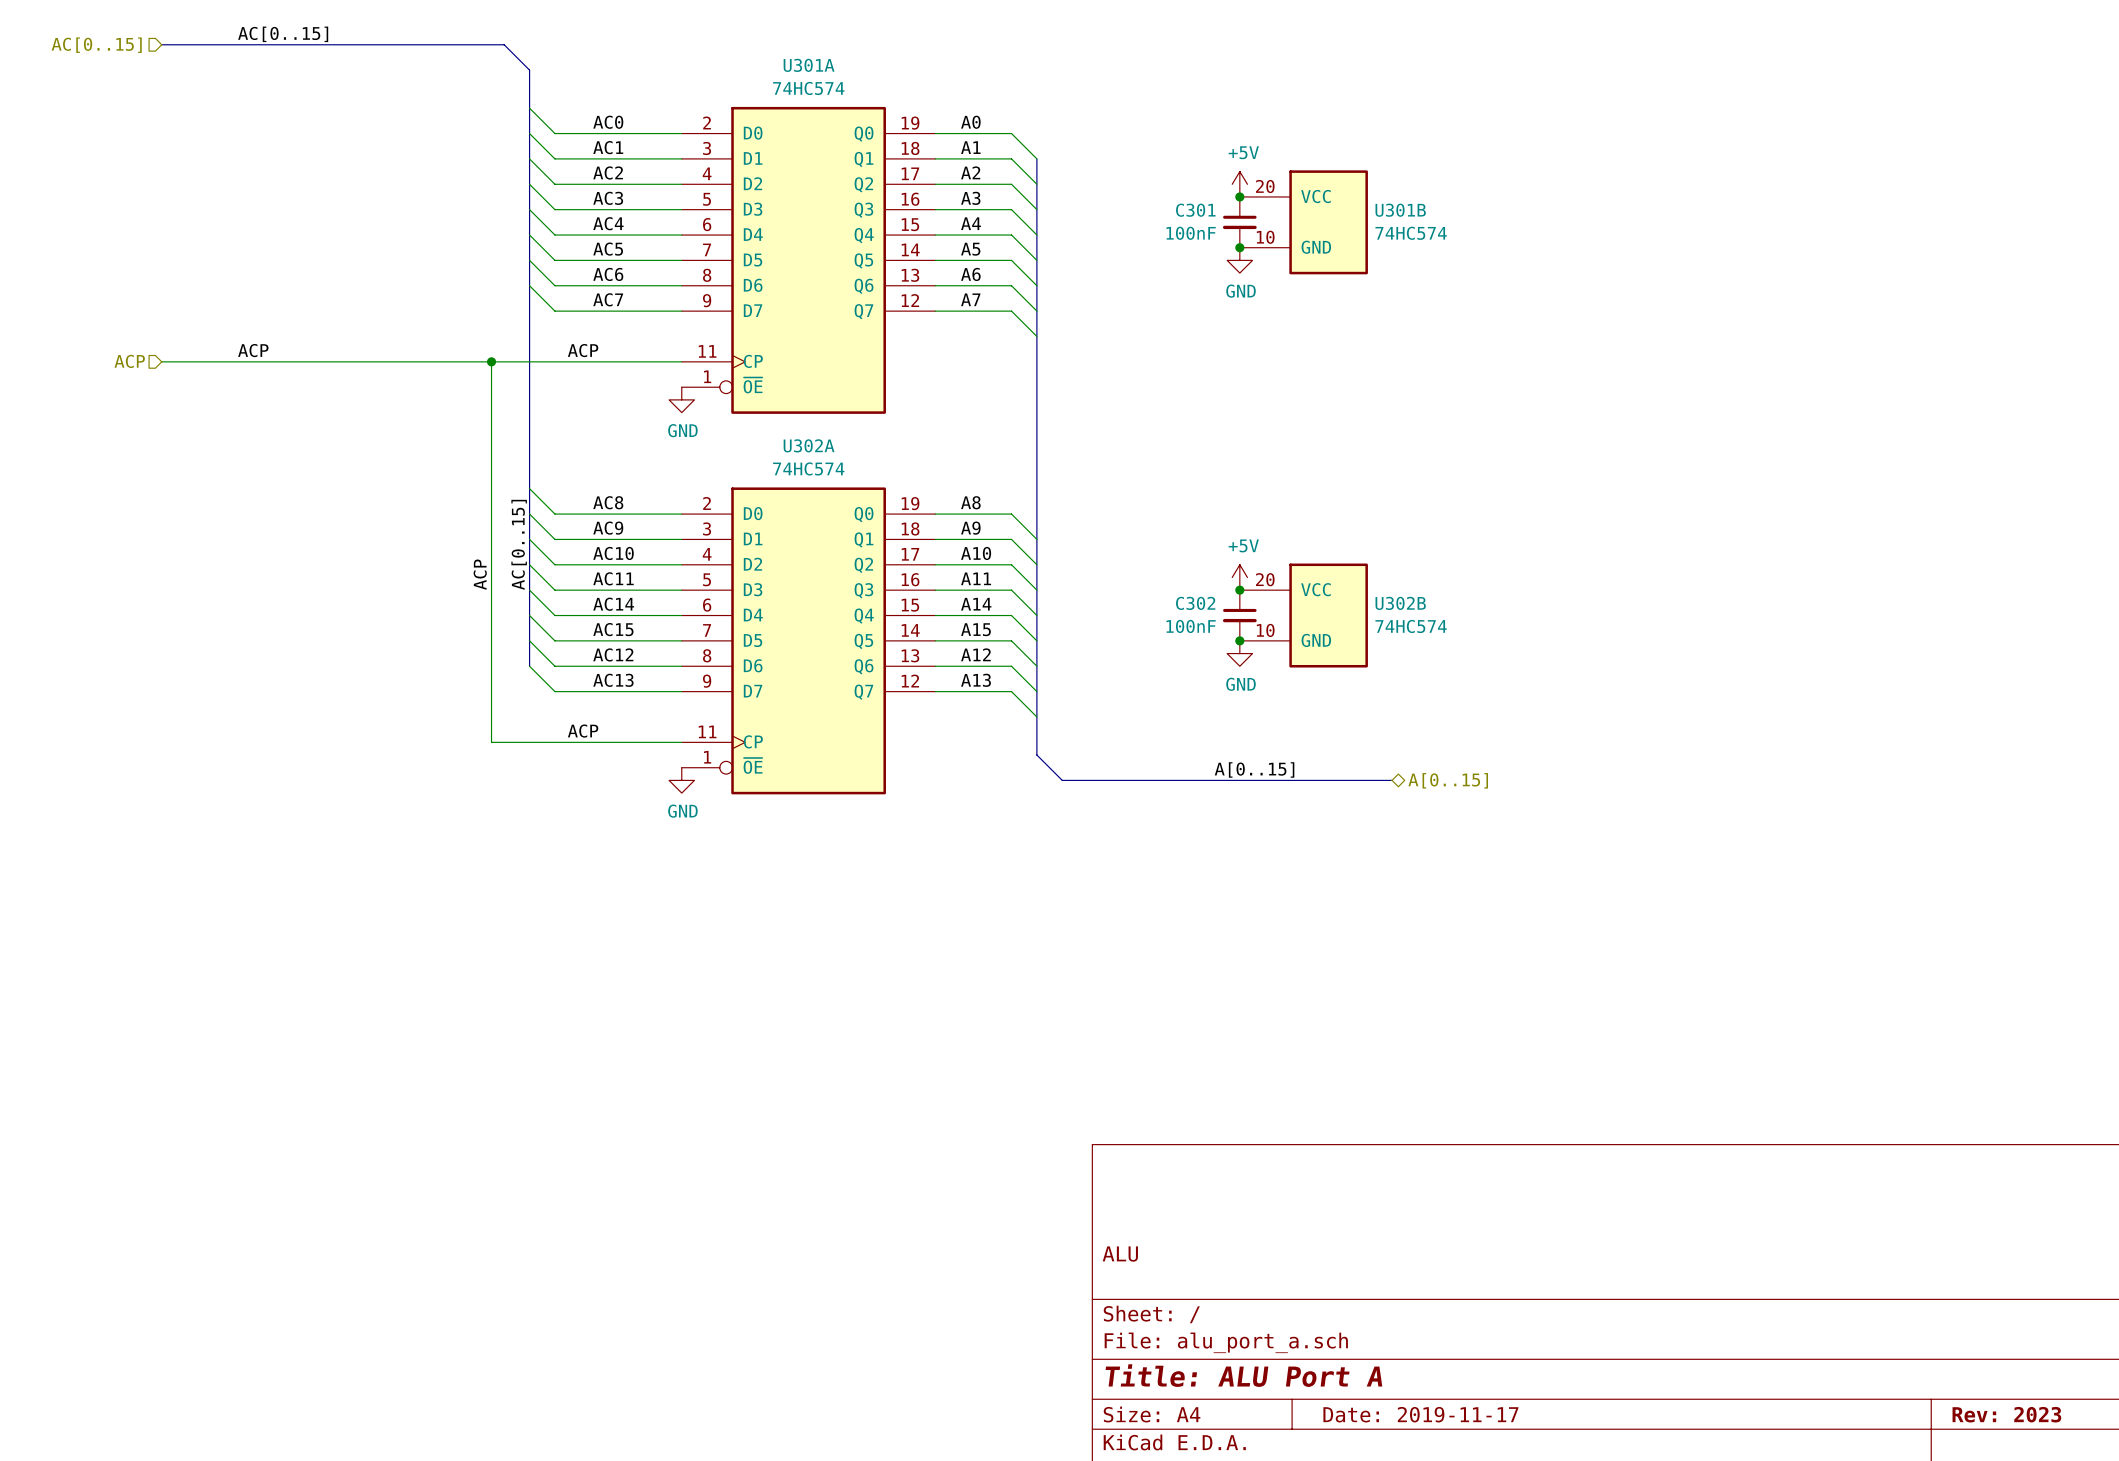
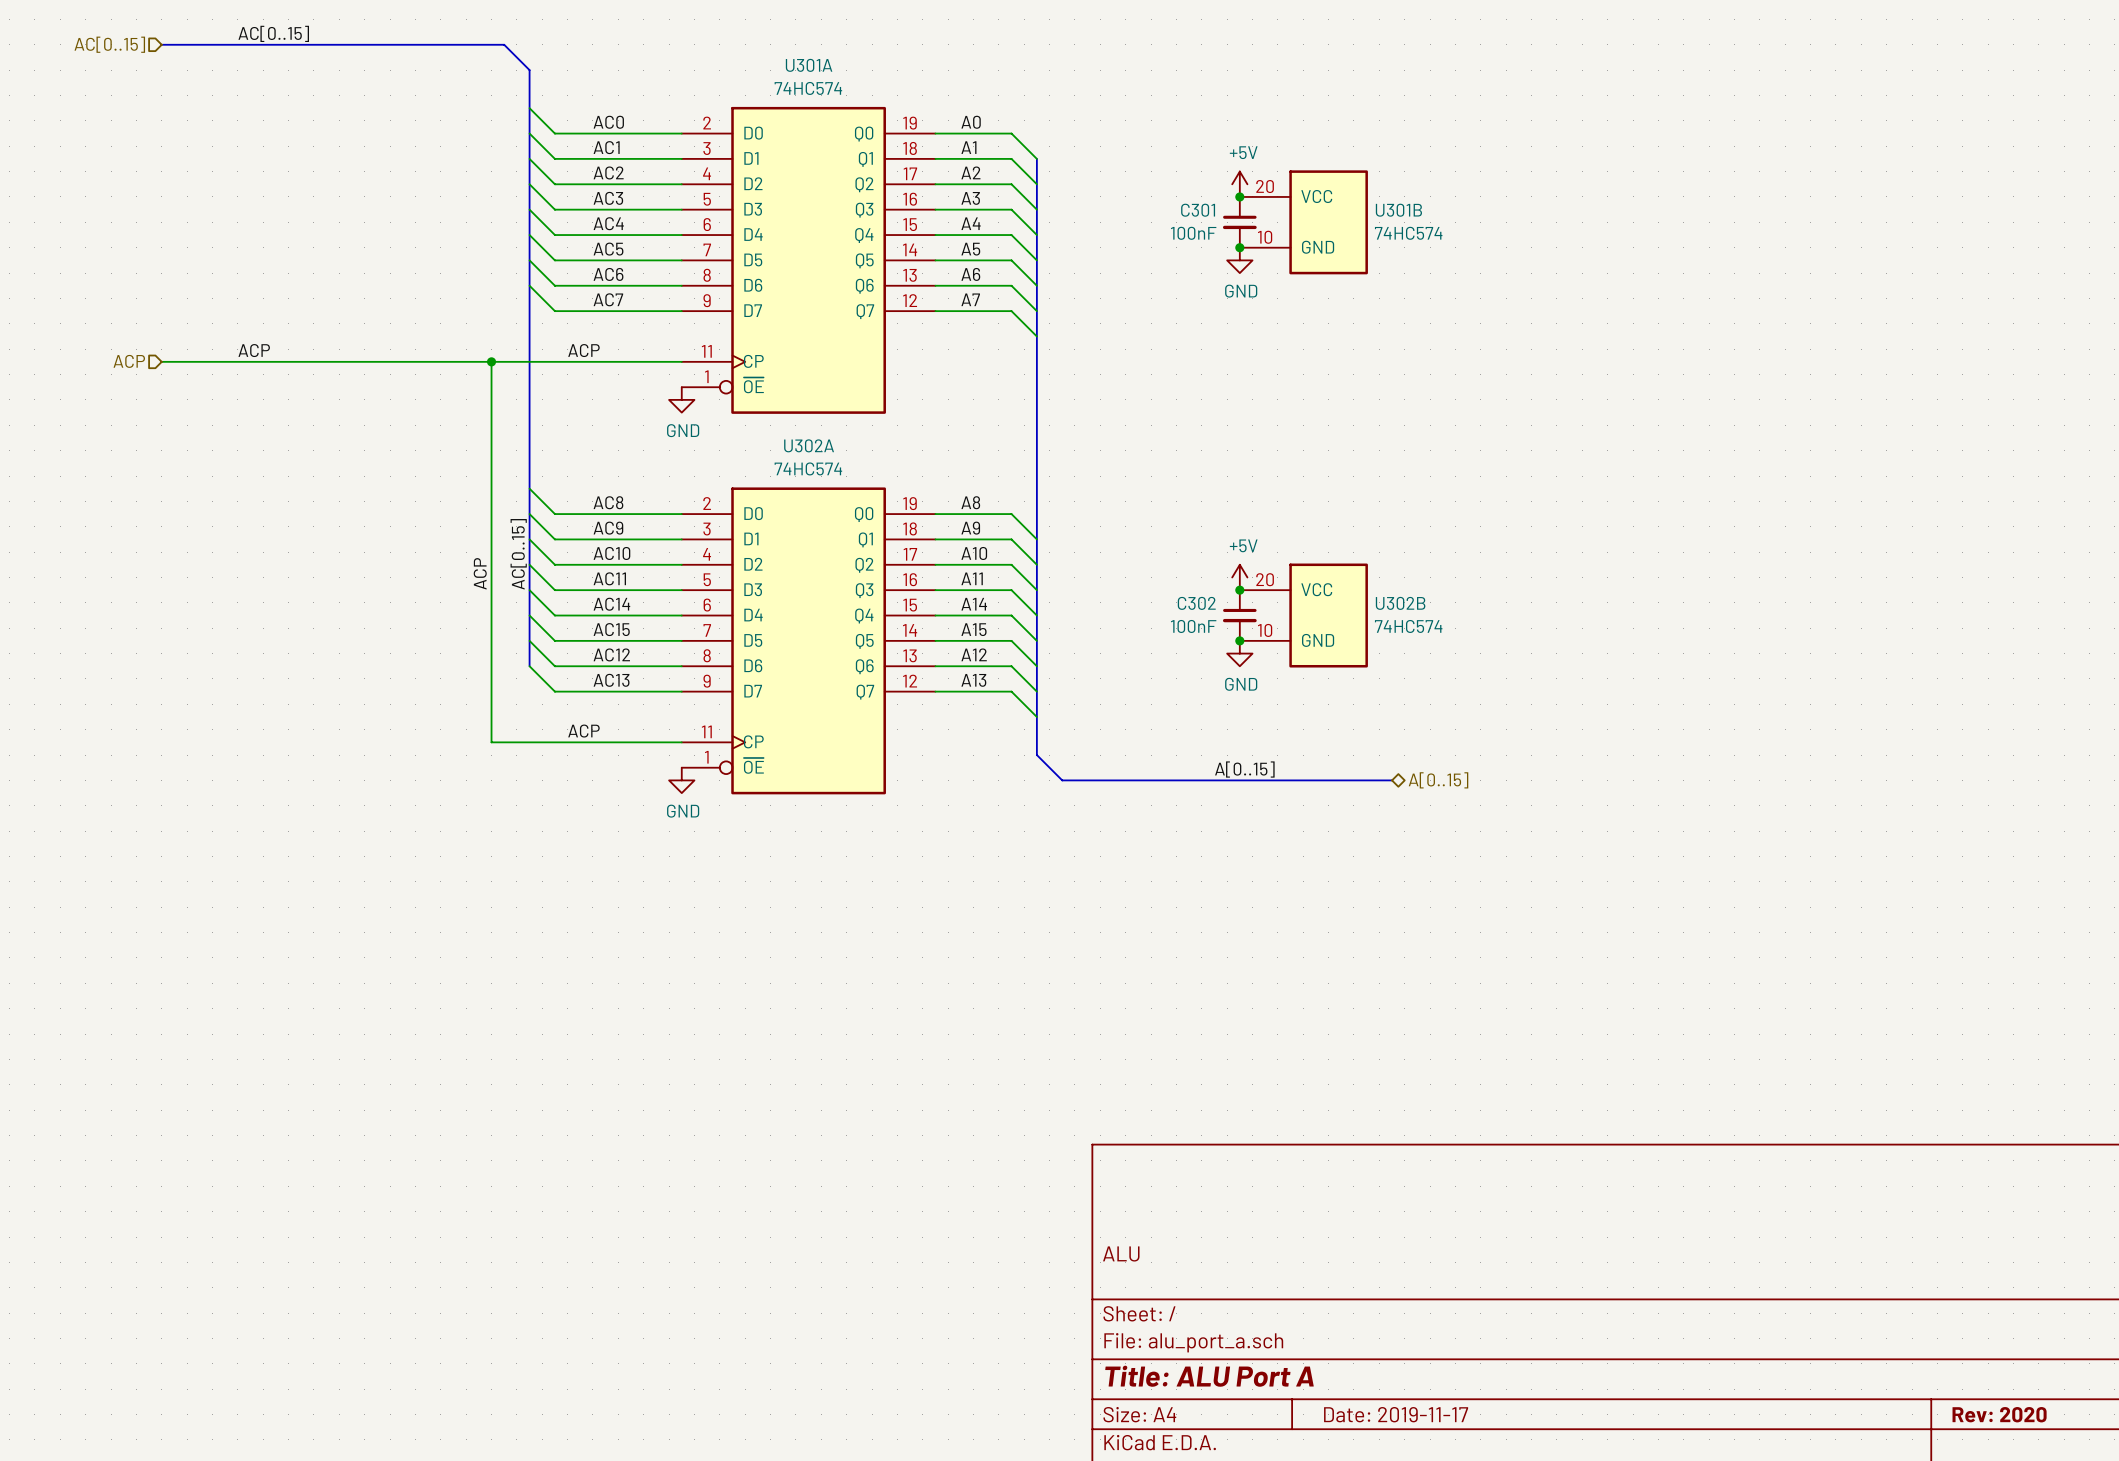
title block: Rev: 2023 (2006, 1414) -> Rev: 2020 (1999, 1414)

